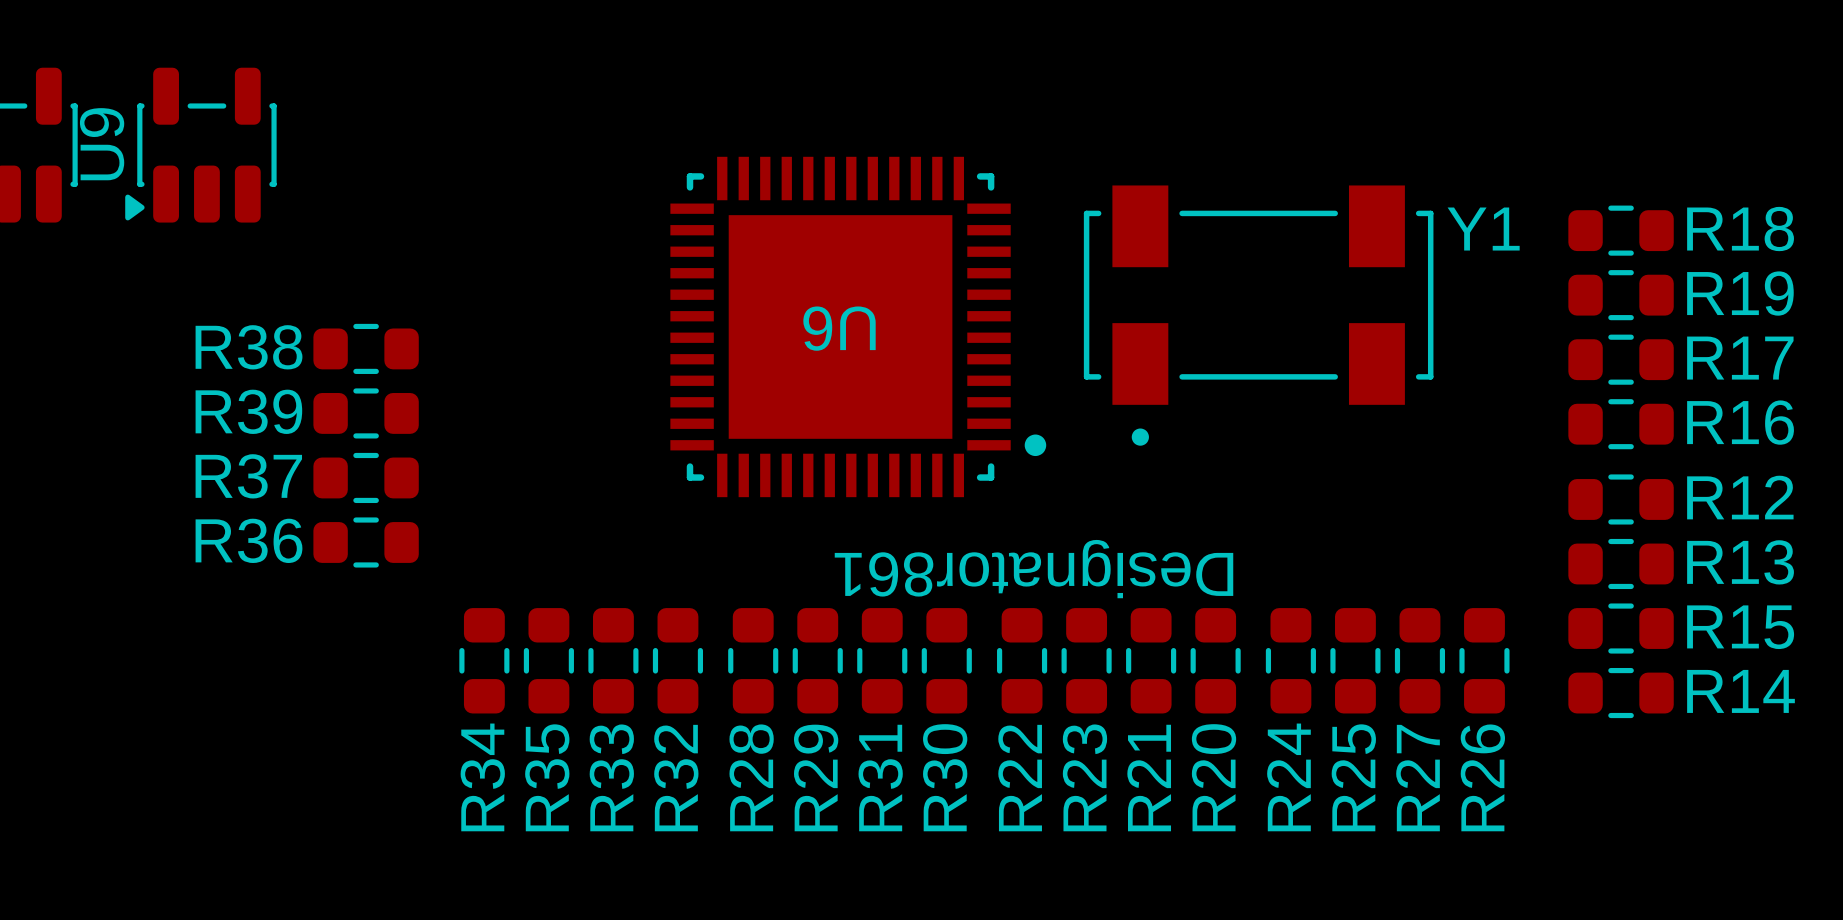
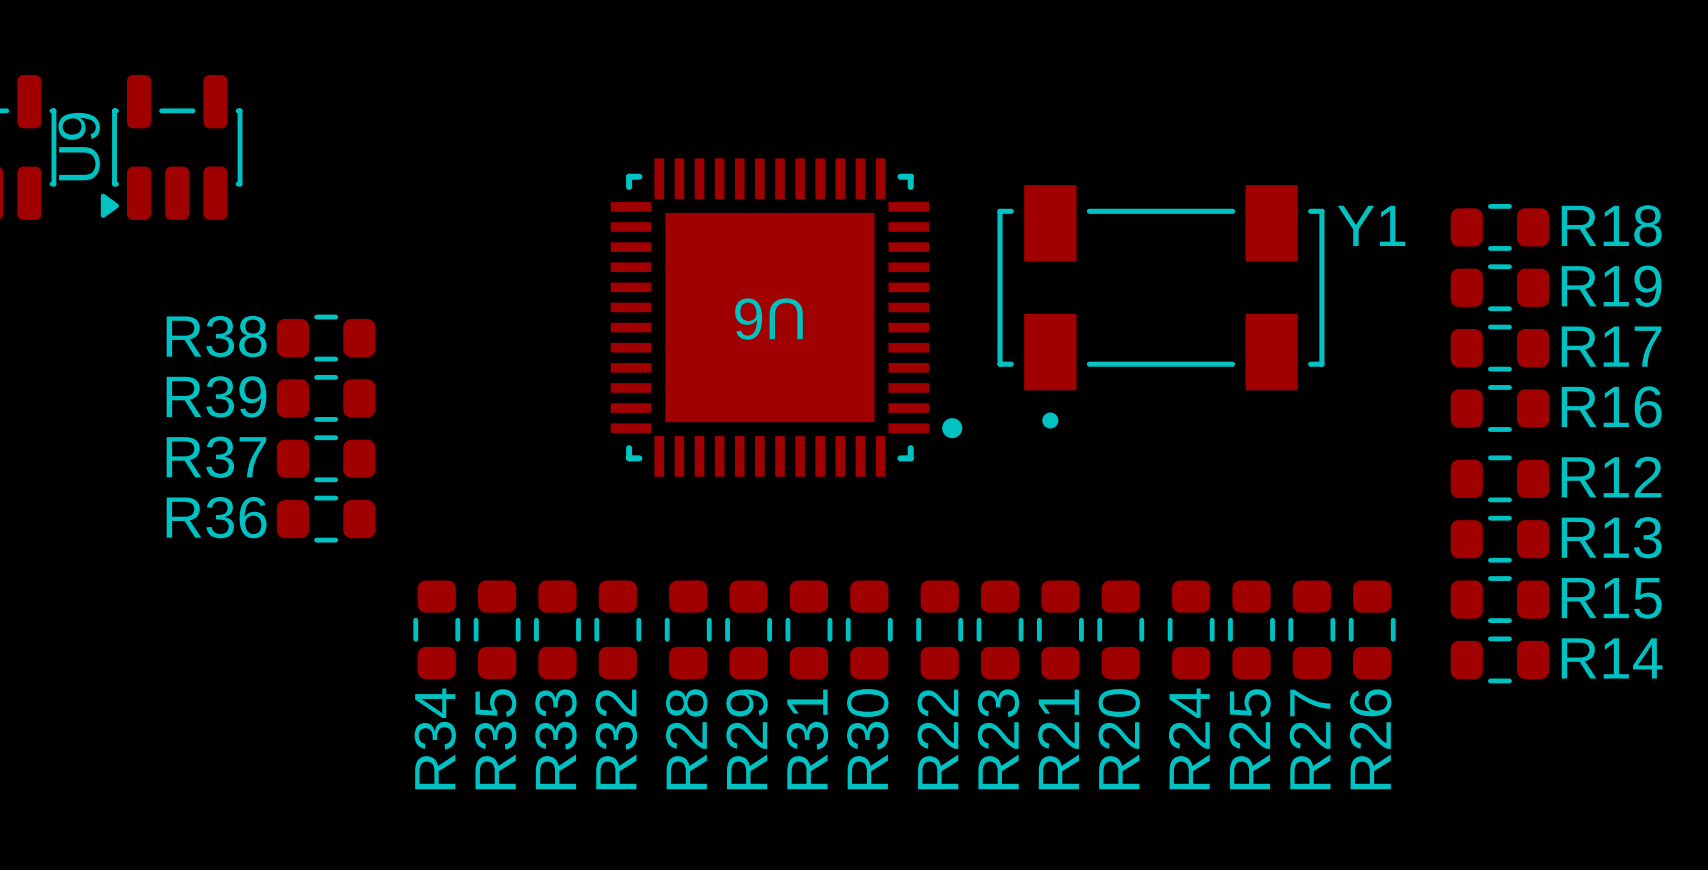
U6 text: Designator861 (1033, 569) -> none

